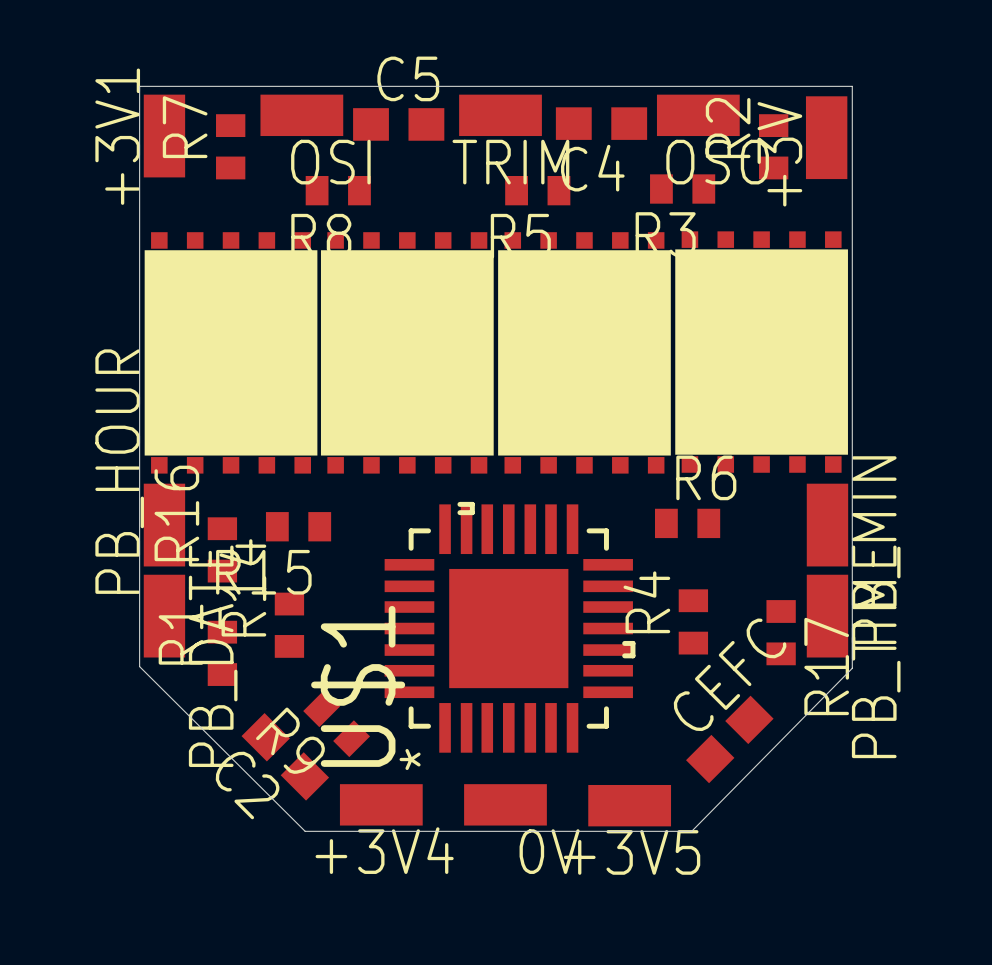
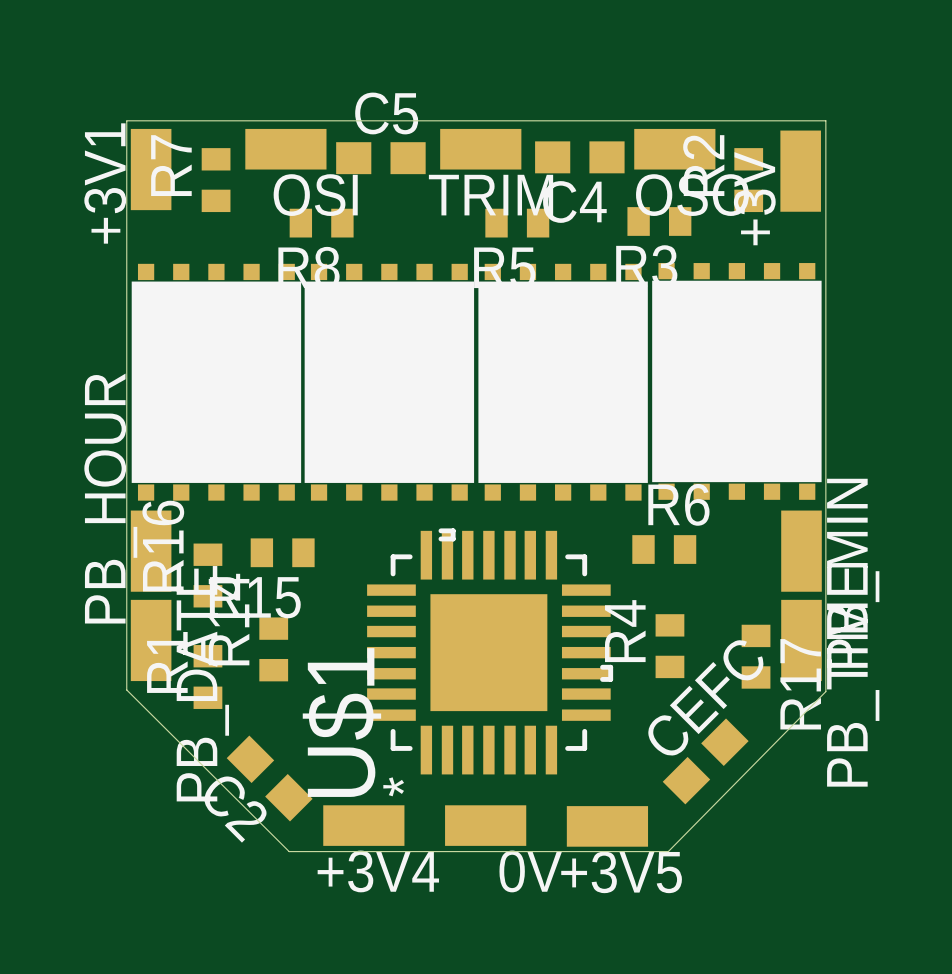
R9: (336, 723) -> none

